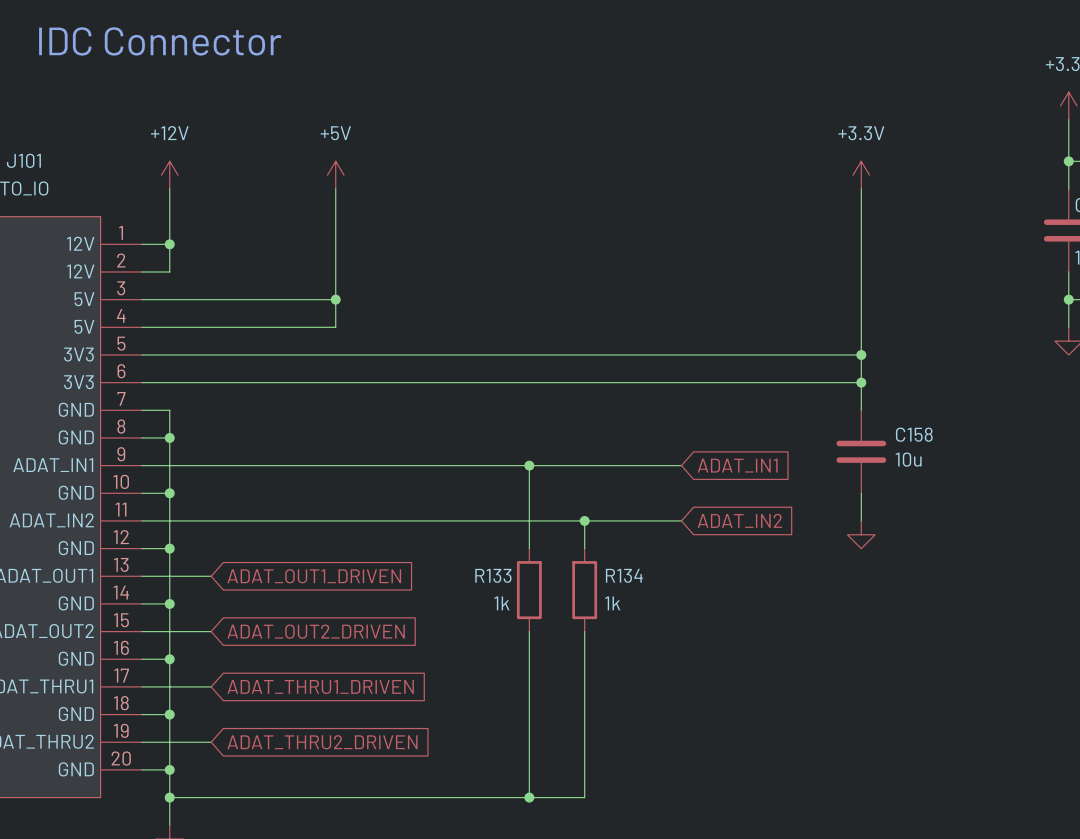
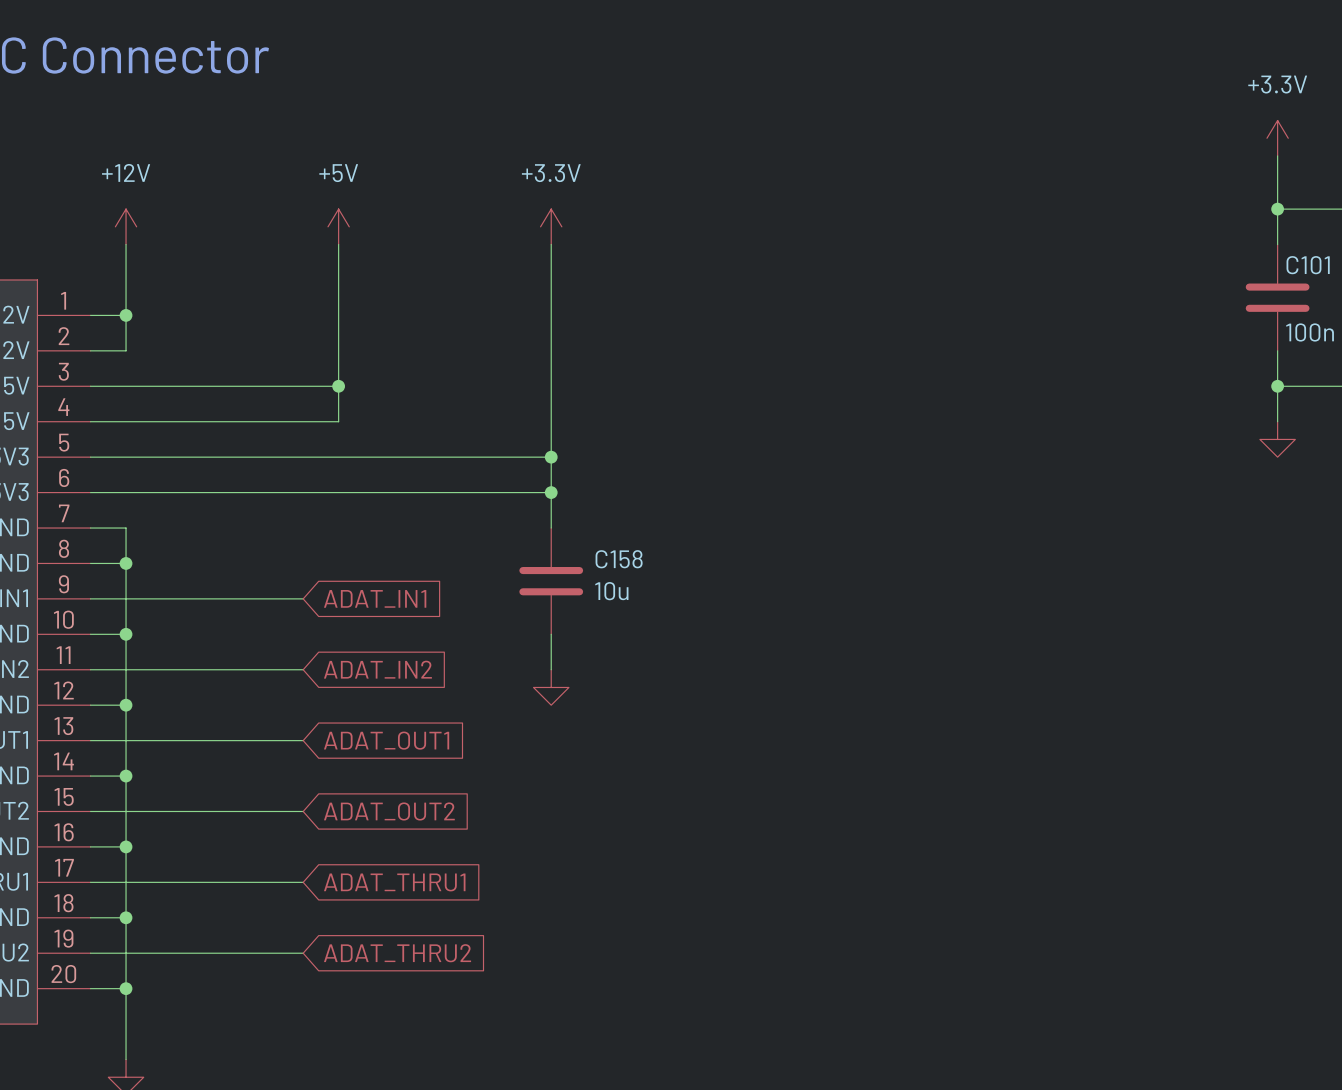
power symbol: none -> +3.3V (551, 226)
power symbol: +3.3V (861, 175) -> none
wire: none -> (551, 244) (551, 528)
wire: (861, 189) (861, 410) -> none
wire: (501, 354) (861, 354) -> none
junction: none -> (551, 457)
junction: (861, 354) -> none
wire: (501, 382) (861, 382) -> none
junction: none -> (551, 492)
junction: (861, 382) -> none
C158 position: (861, 451) -> (551, 581)
wire: (308, 465) (681, 465) -> none
global label: none -> ADAT_IN1 (375, 598)
wire: (529, 465) (529, 548) -> none
junction: (529, 465) -> none
global label: ADAT_IN1 (737, 465) -> none
wire: (861, 493) (861, 520) -> none
wire: (308, 520) (681, 520) -> none
global label: none -> ADAT_IN2 (377, 669)
wire: (584, 520) (584, 548) -> (551, 634) (551, 669)
junction: (584, 520) -> none
global label: ADAT_IN2 (739, 520) -> none
power symbol: none -> (551, 687)
power symbol: (861, 534) -> none
wire: none -> (179, 740) (303, 740)
global label: ADAT_OUT1_DRIVEN (314, 576) -> ADAT_OUT1 (386, 740)
R133: 1k (529, 590) -> none
R134: 1k (584, 590) -> none
wire: none -> (179, 811) (303, 811)
global label: ADAT_OUT2_DRIVEN (316, 631) -> ADAT_OUT2 (389, 811)
wire: (529, 631) (529, 797) -> none
wire: (584, 631) (584, 797) (169, 797) -> none
wire: none -> (179, 882) (303, 882)
global label: ADAT_THRU1_DRIVEN (320, 687) -> ADAT_THRU1 (394, 882)
wire: none -> (179, 953) (303, 953)
global label: ADAT_THRU2_DRIVEN (322, 742) -> ADAT_THRU2 (397, 953)
junction: (169, 797) -> none
junction: (529, 797) -> none

